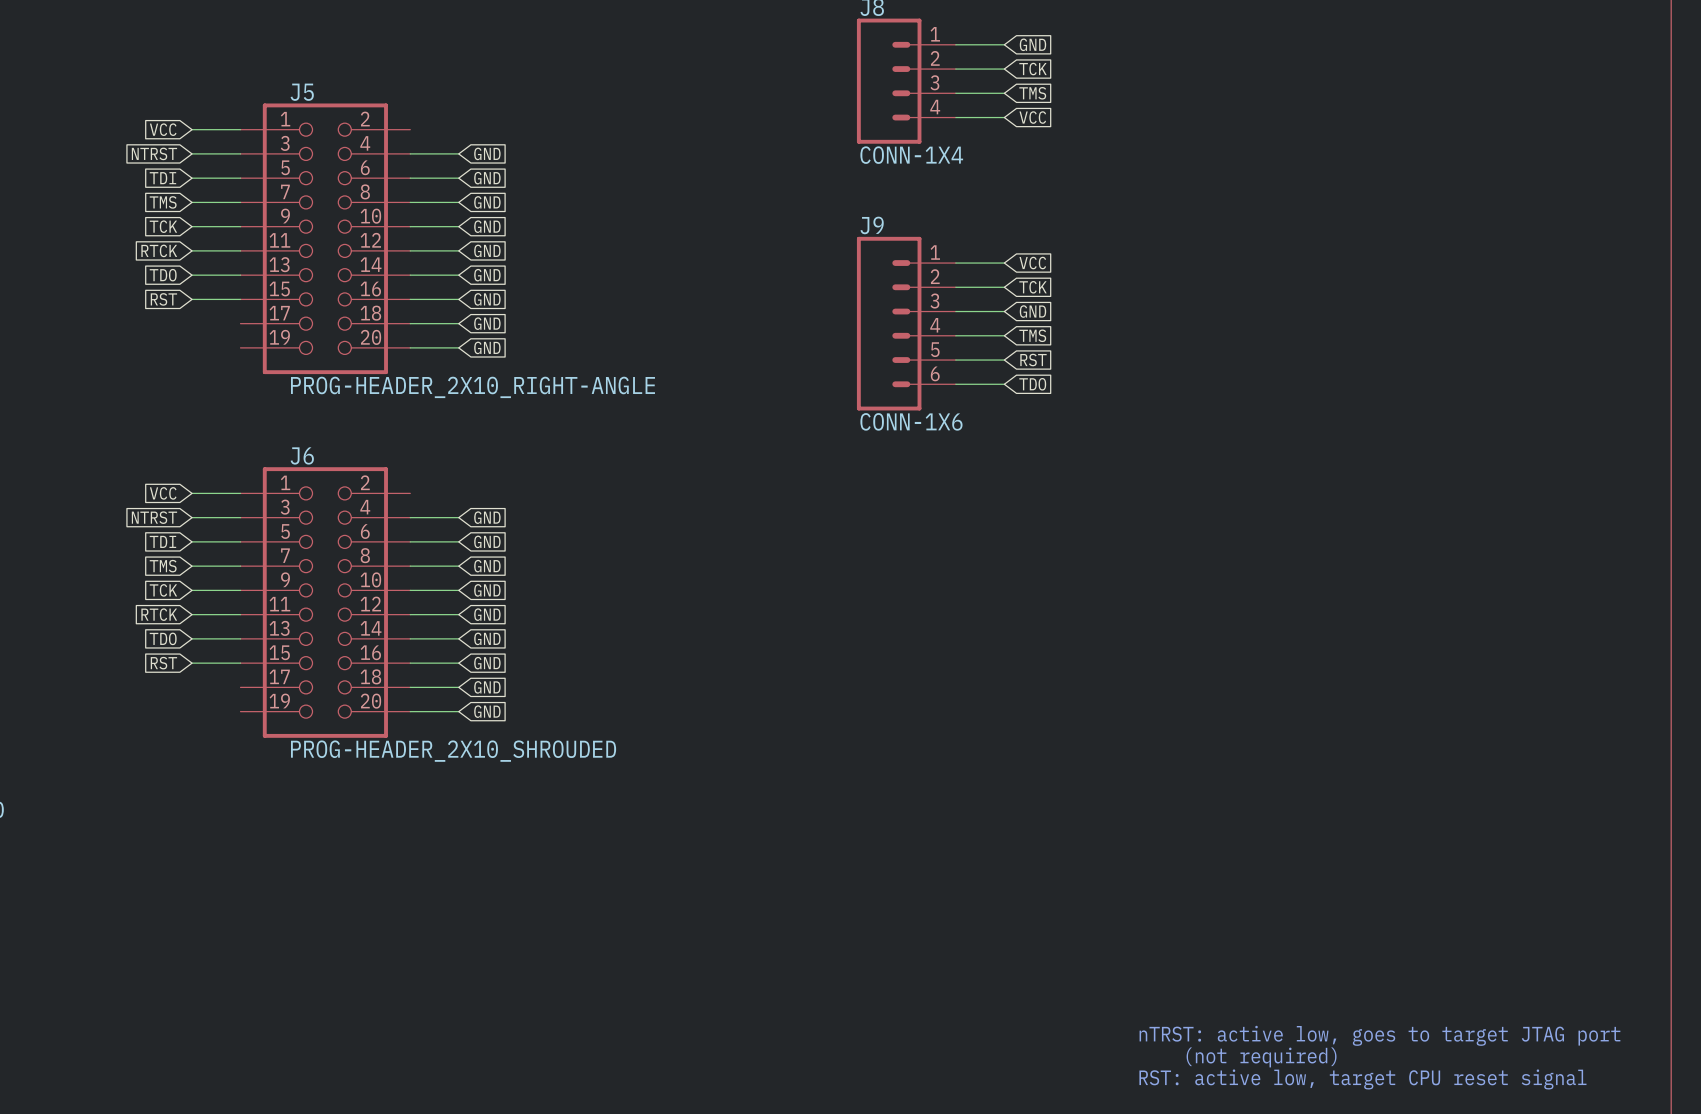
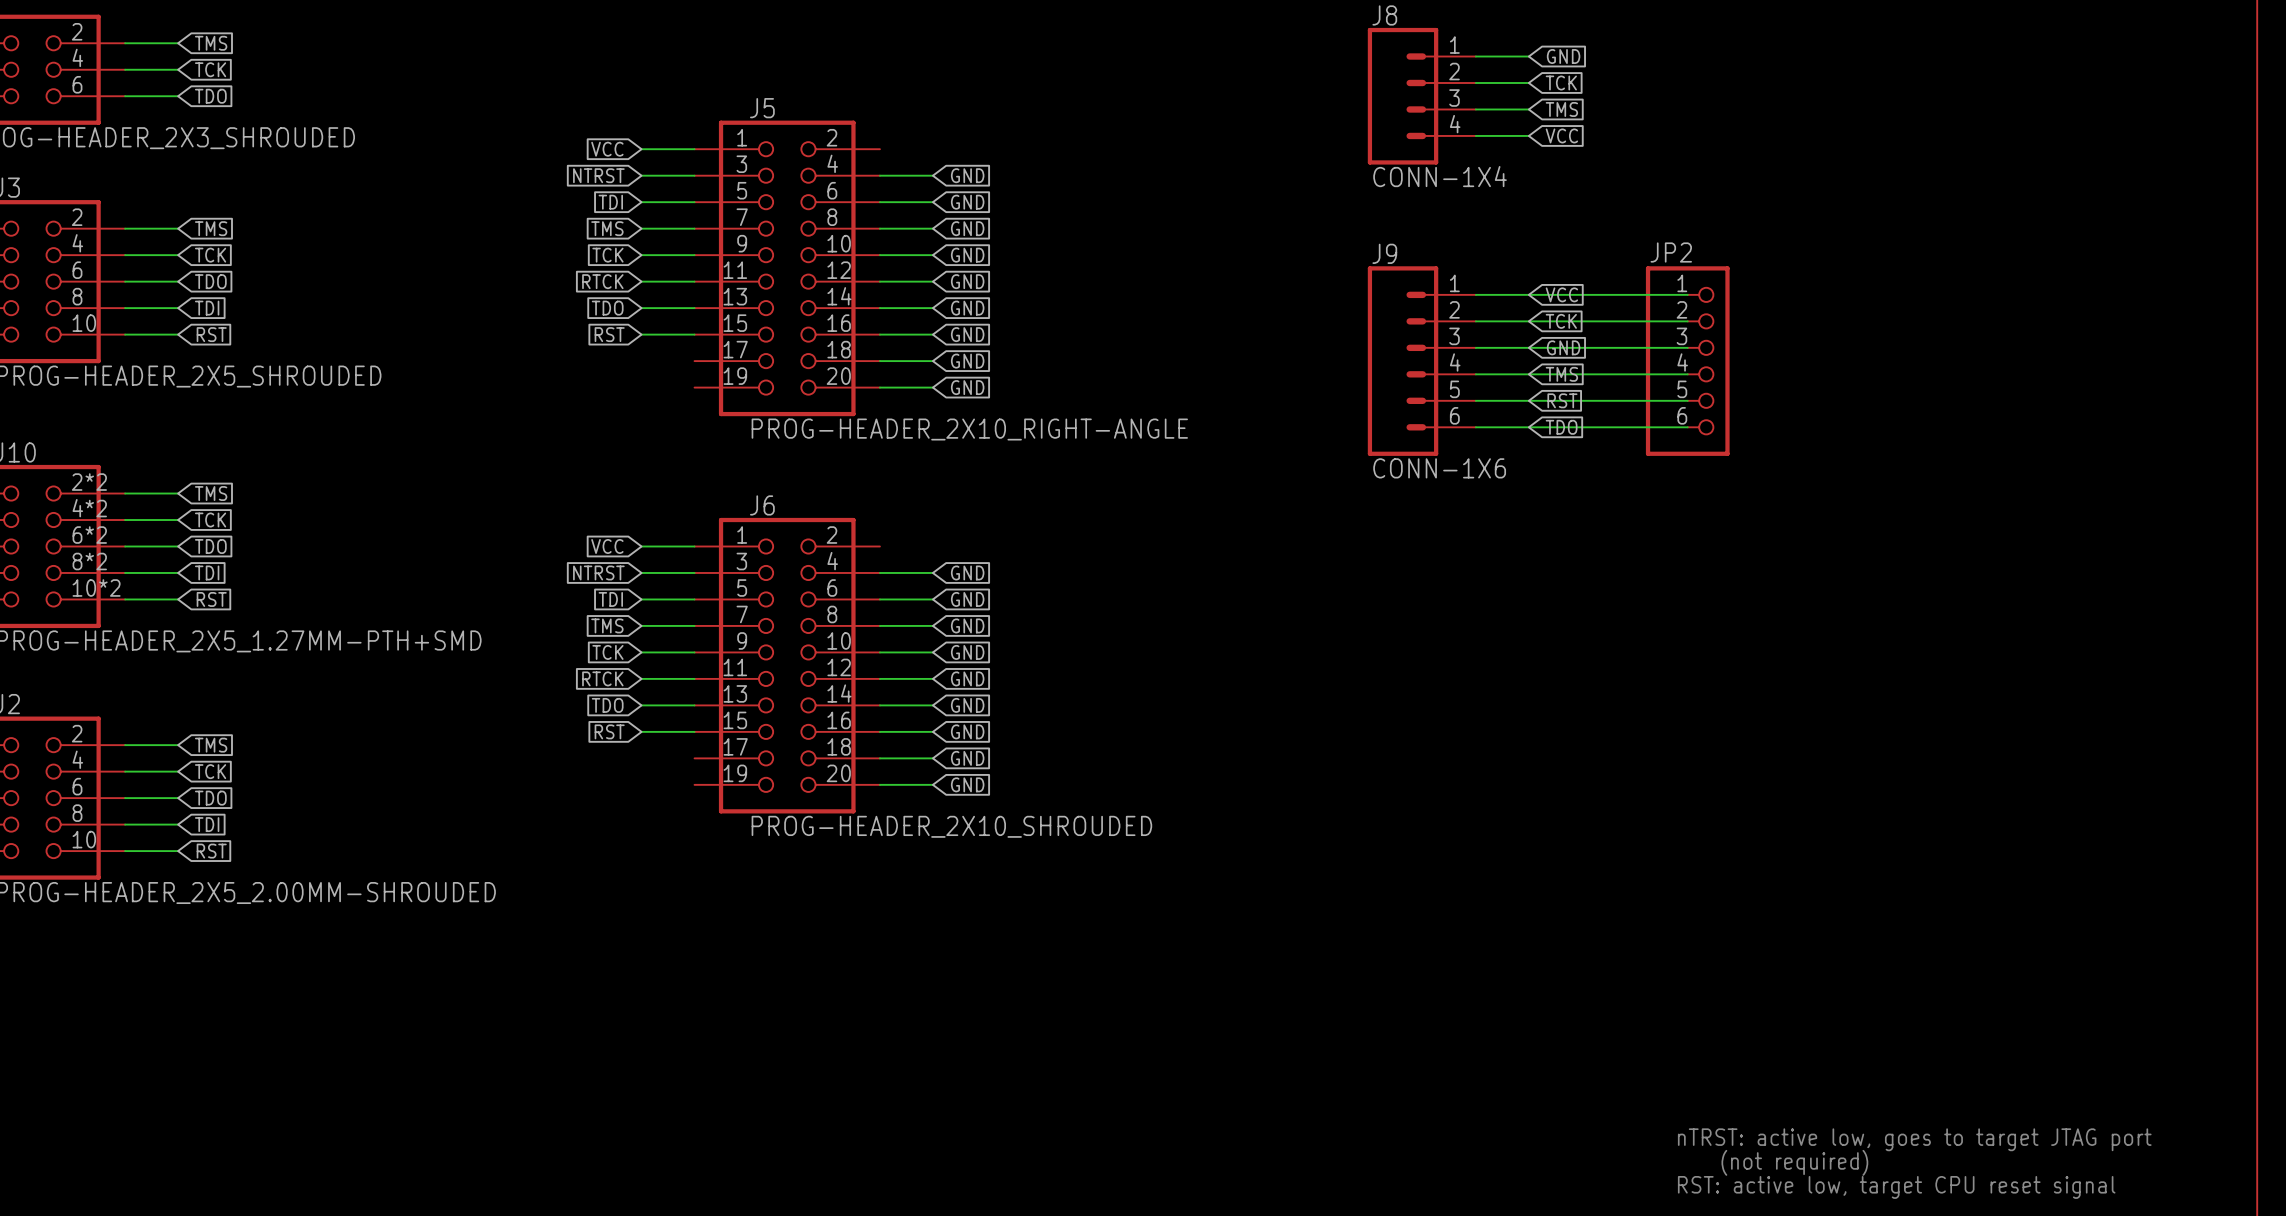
wire: none -> (1528, 294) (1687, 294)
wire: none -> (1528, 321) (1687, 321)
wire: none -> (1528, 347) (1687, 347)
JP2: none -> (1687, 361)
wire: none -> (1528, 374) (1687, 374)
wire: none -> (1528, 400) (1687, 400)
wire: none -> (1528, 427) (1687, 427)

